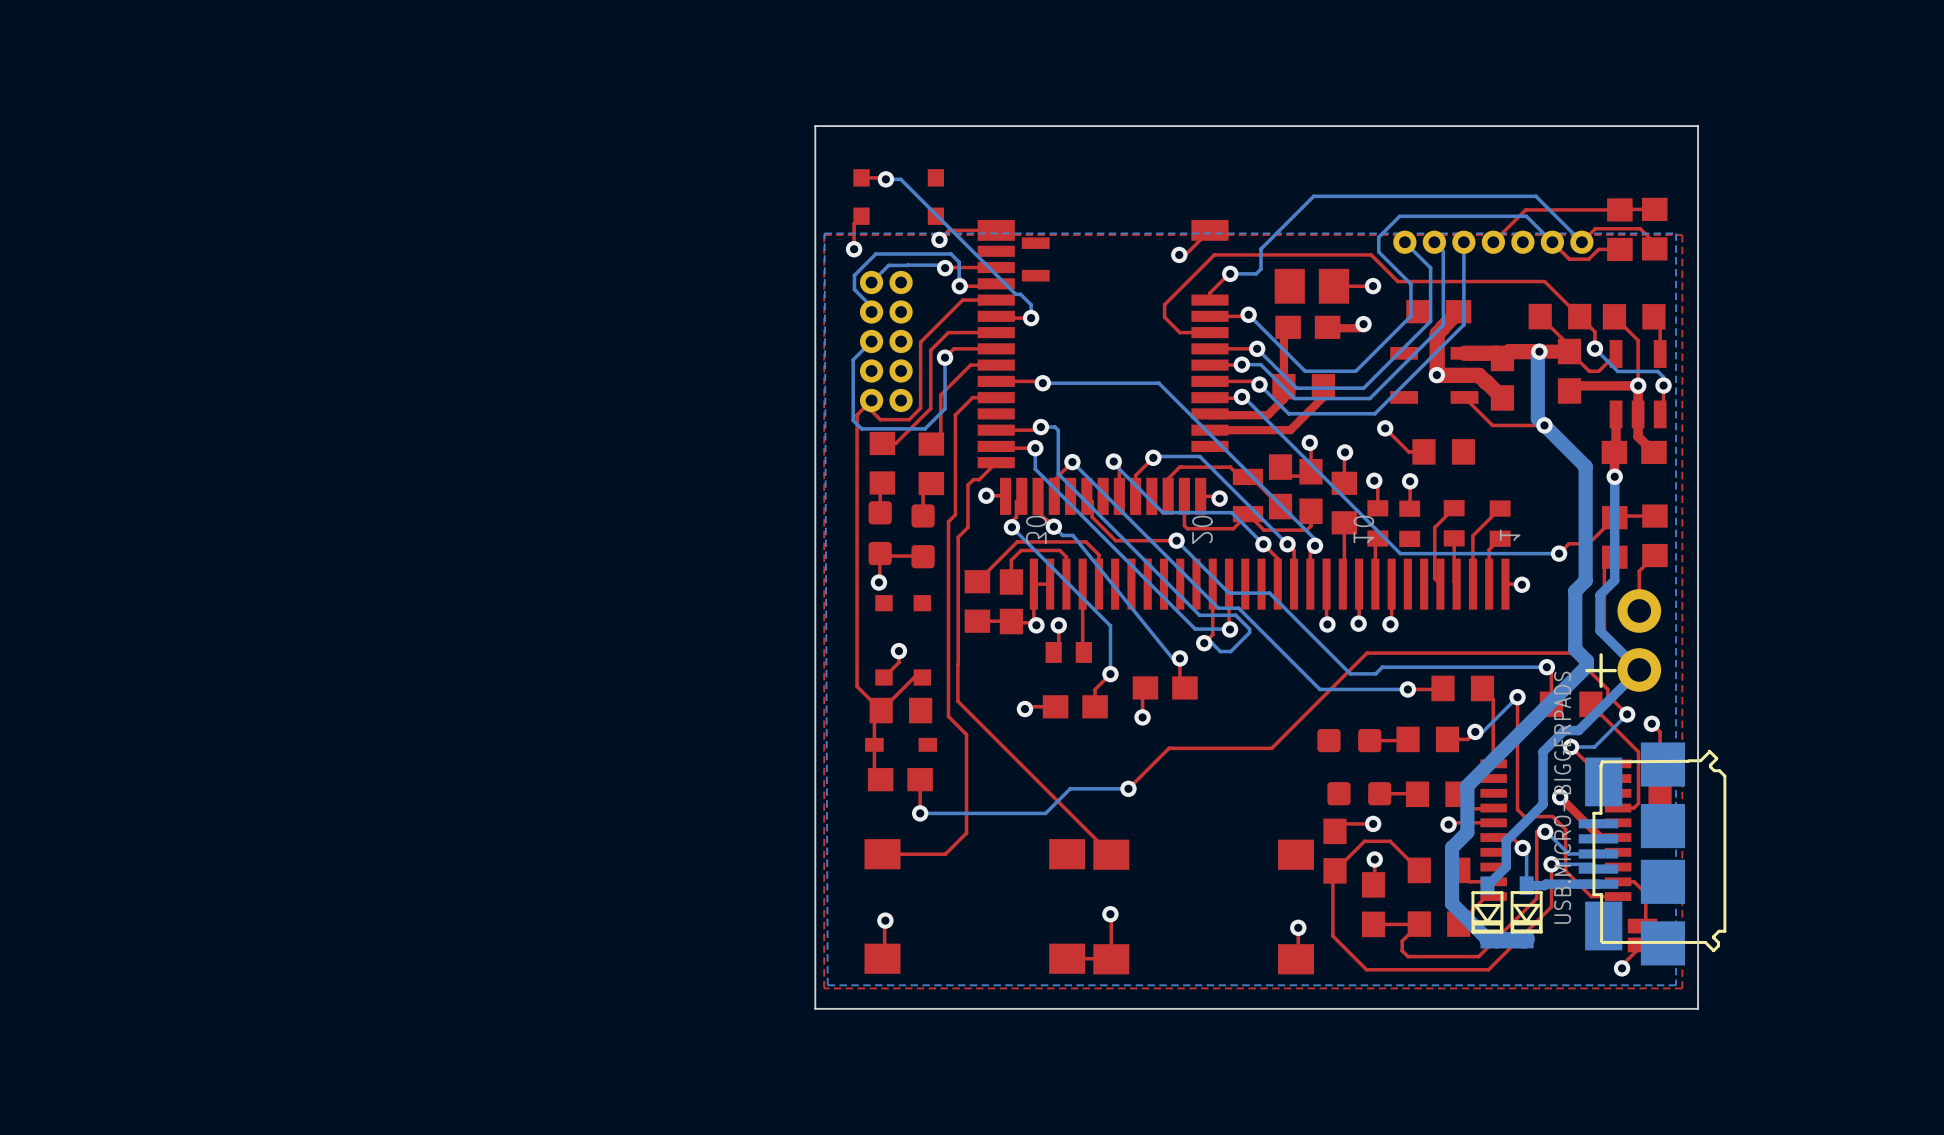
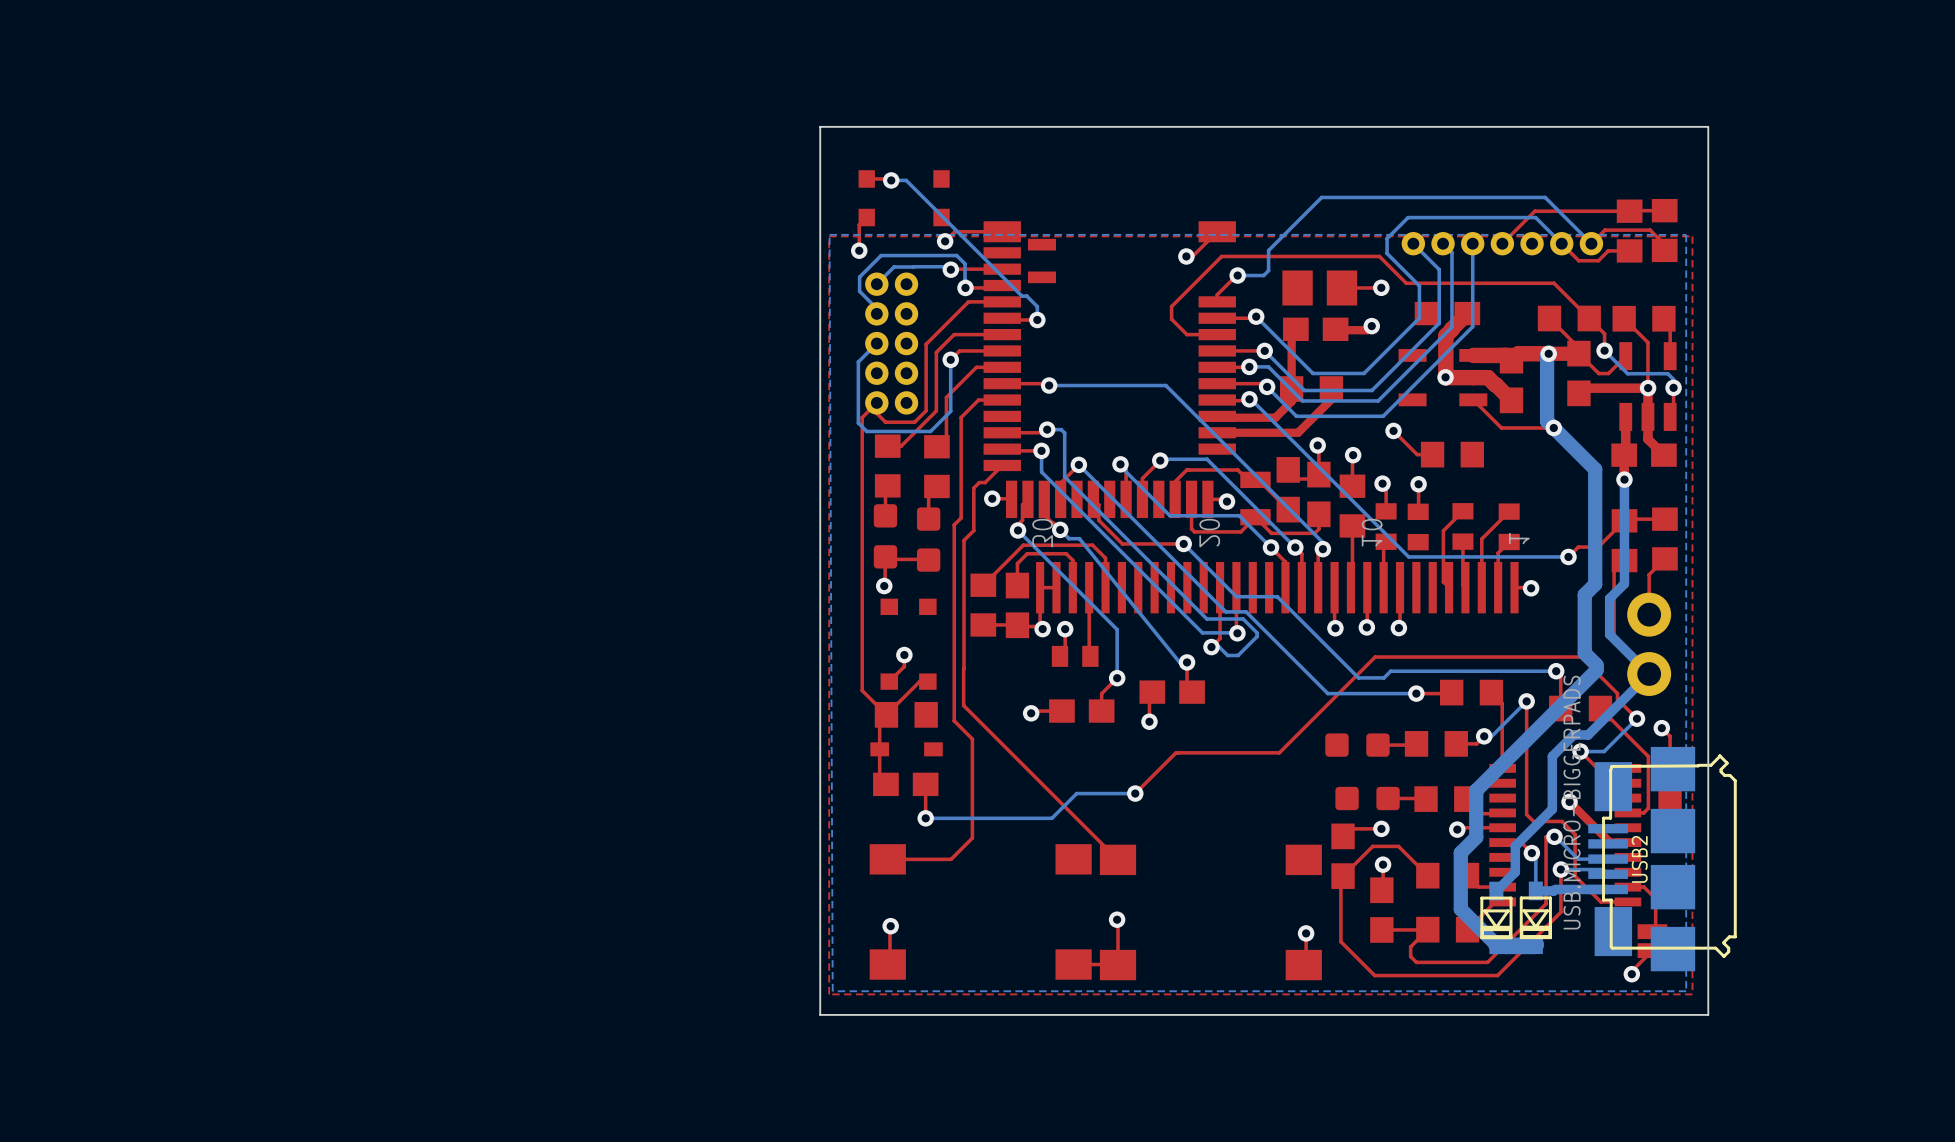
text: + (1601, 670) -> none
USB2 name: none -> USB2 (1639, 859)

